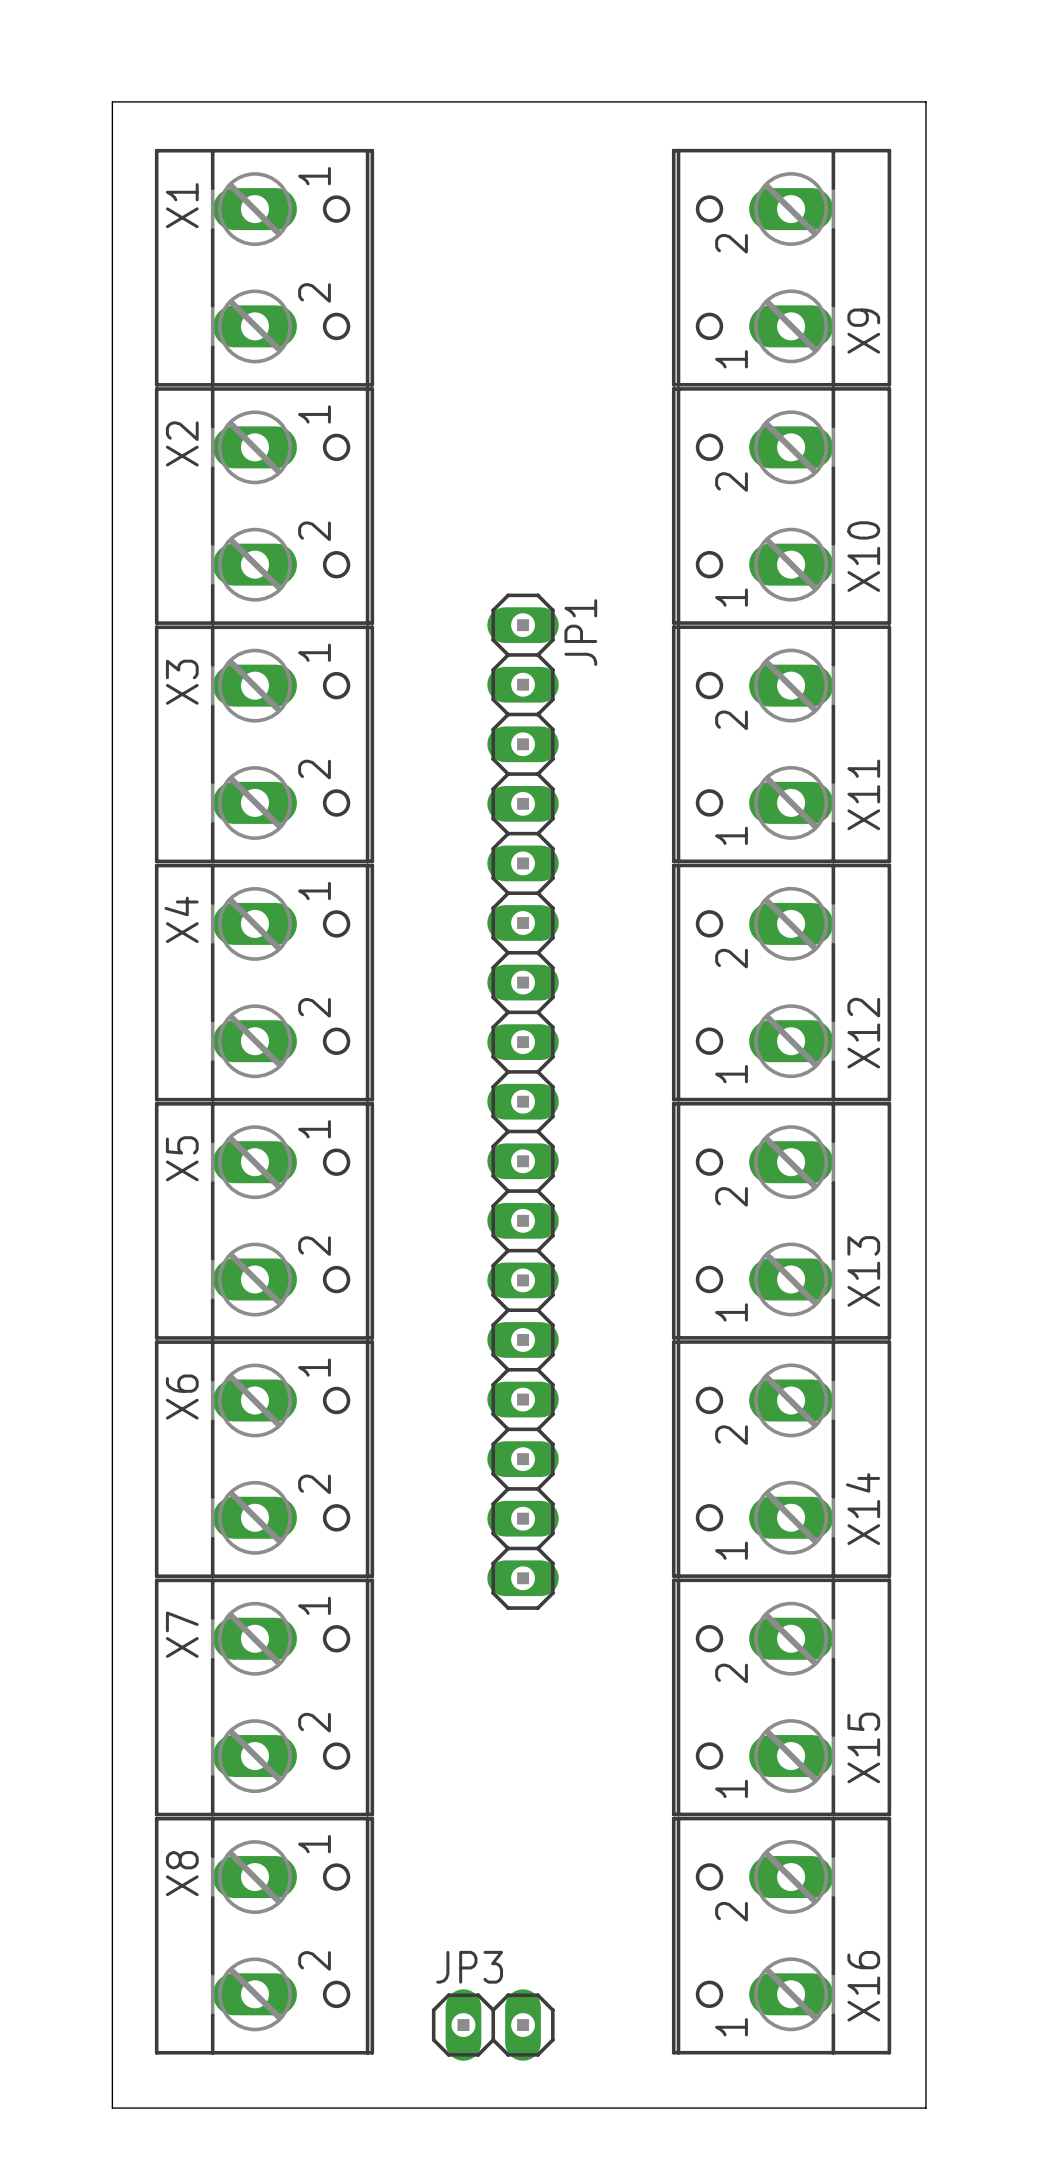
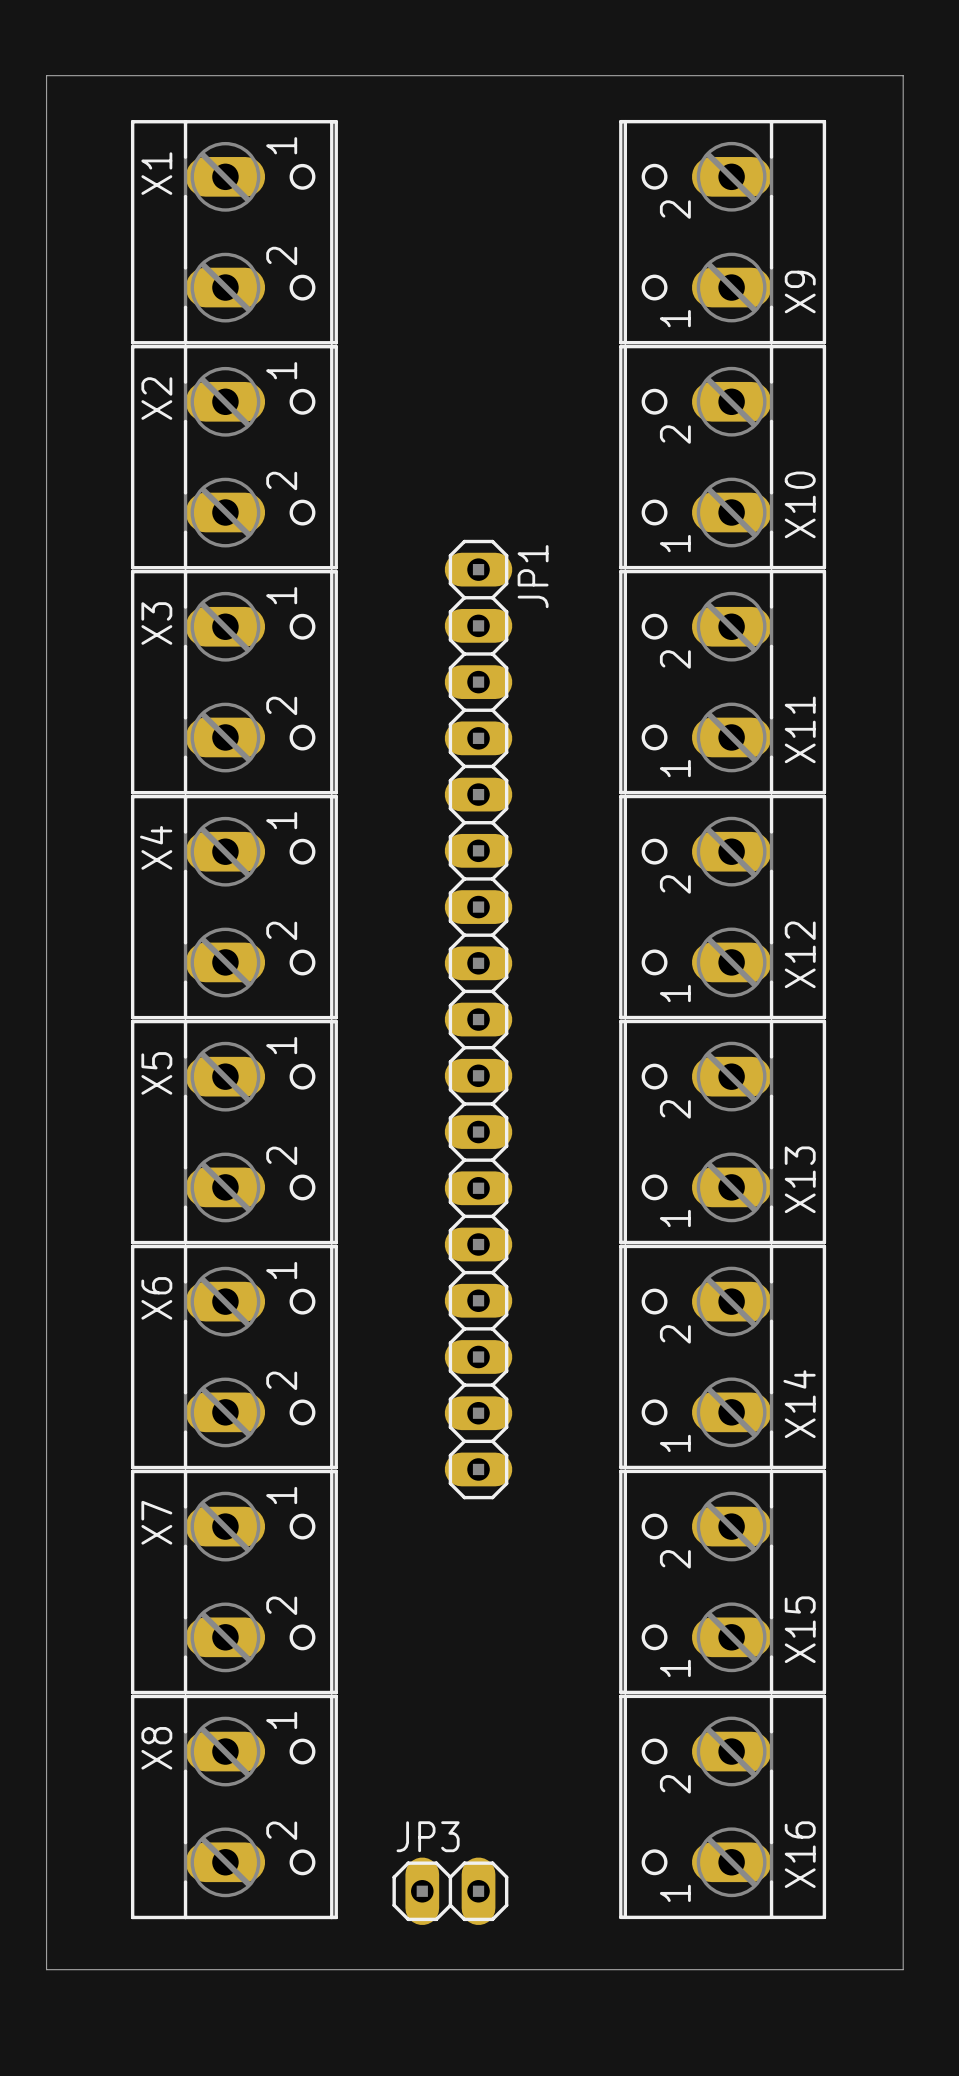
board edge: (112, 101) (112, 2108) -> (90, 75) (46, 75) (46, 1969) (90, 1969)
board edge: (925, 101) (925, 2108) -> (858, 75) (903, 75) (903, 1969) (858, 1969)

